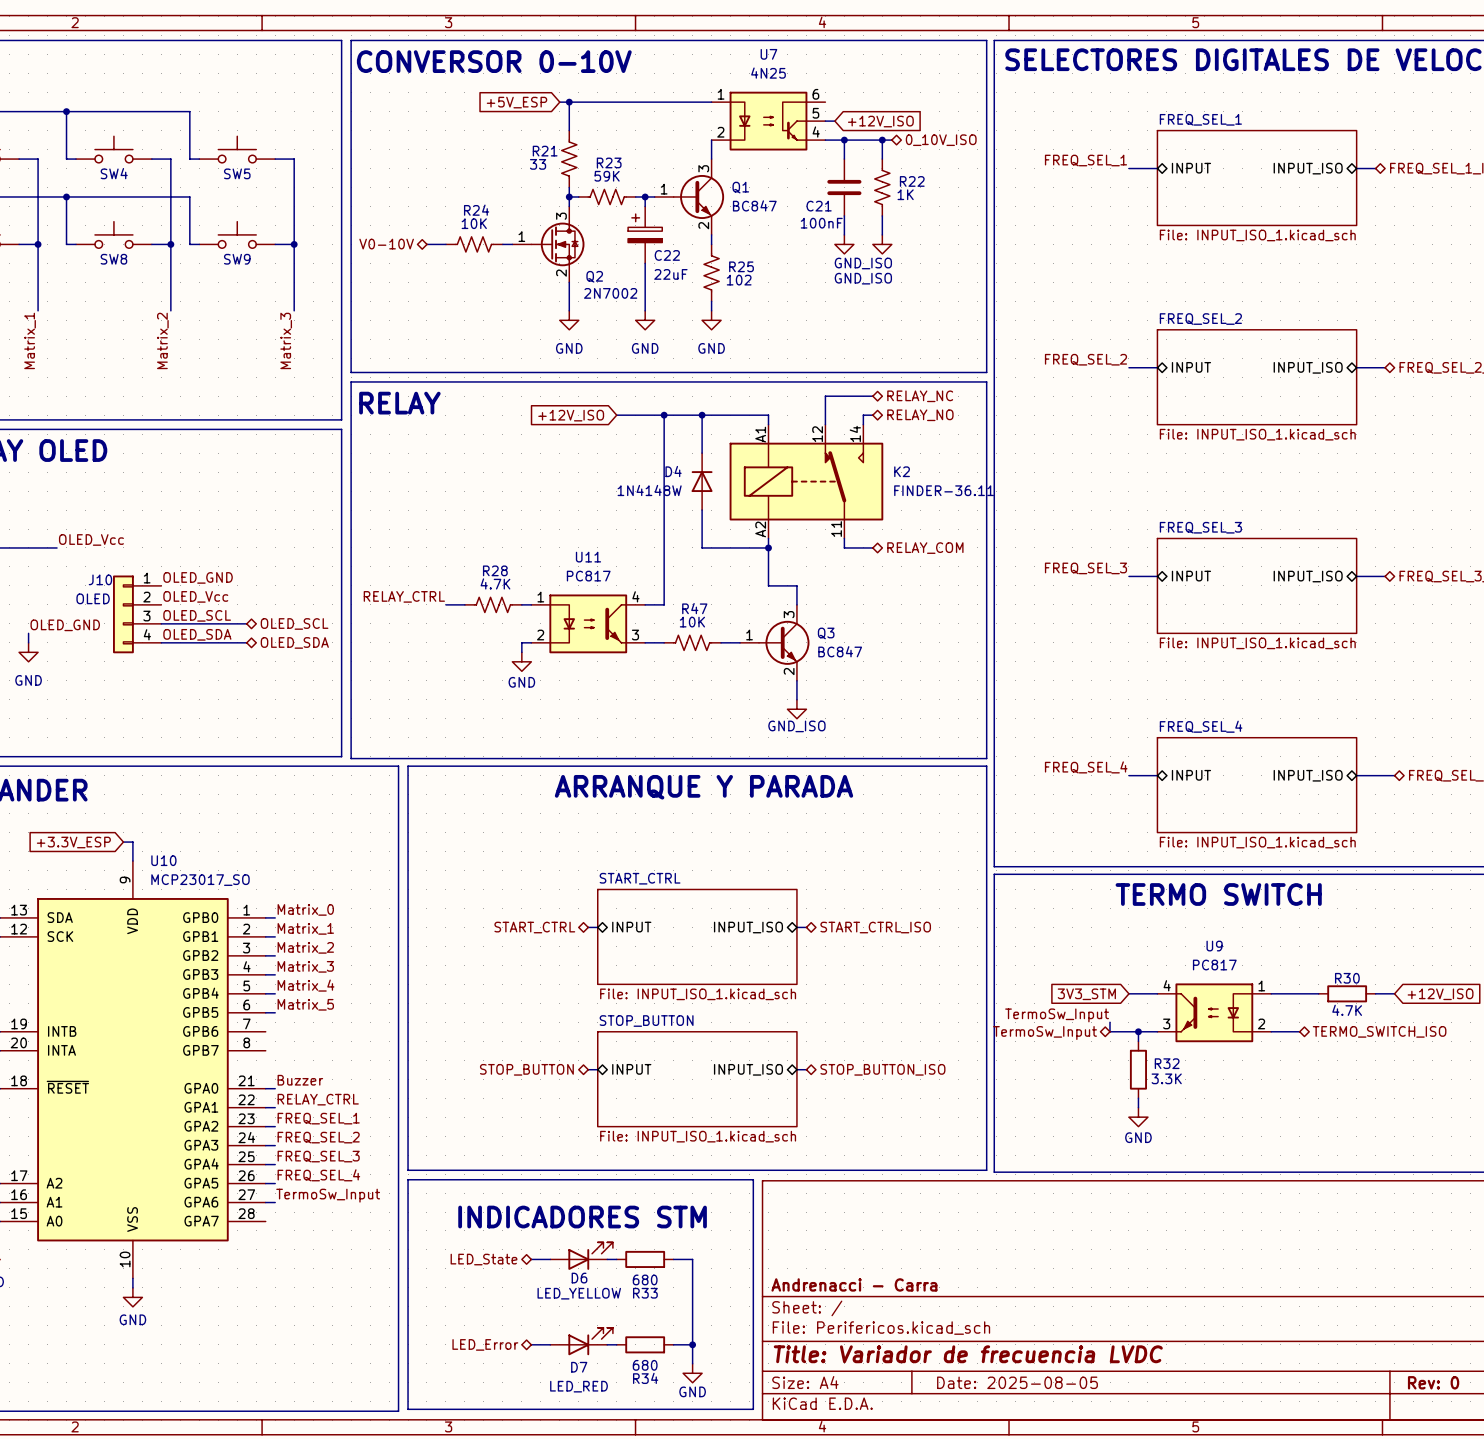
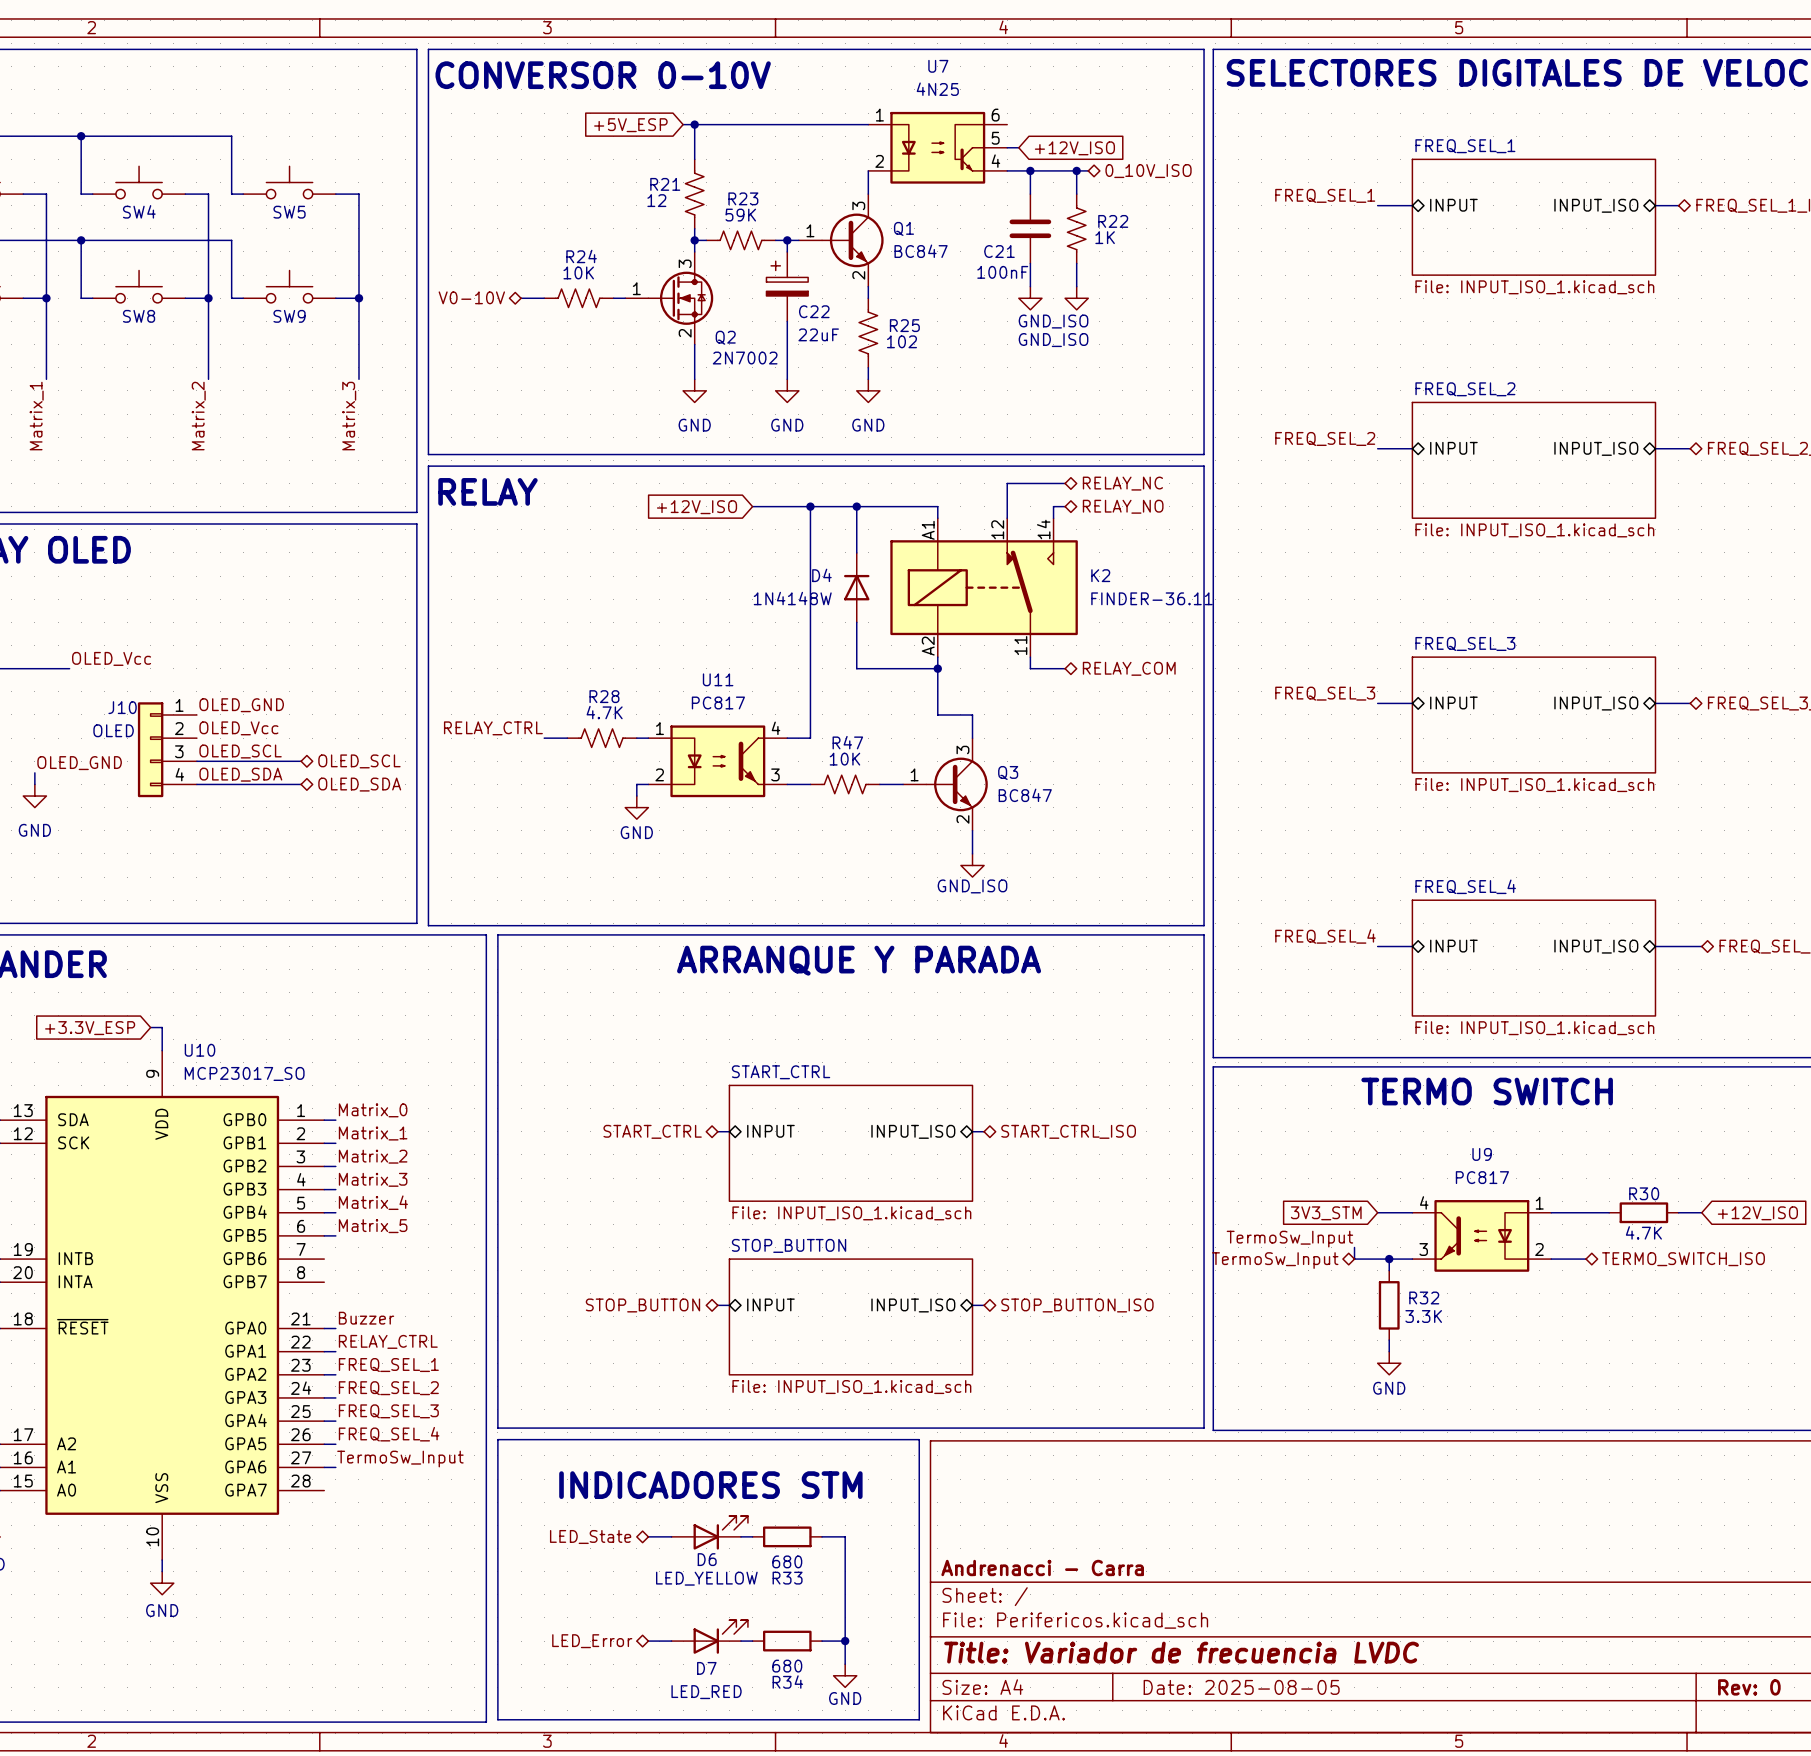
R21 value: 33 (538, 164) -> 12 (656, 200)

